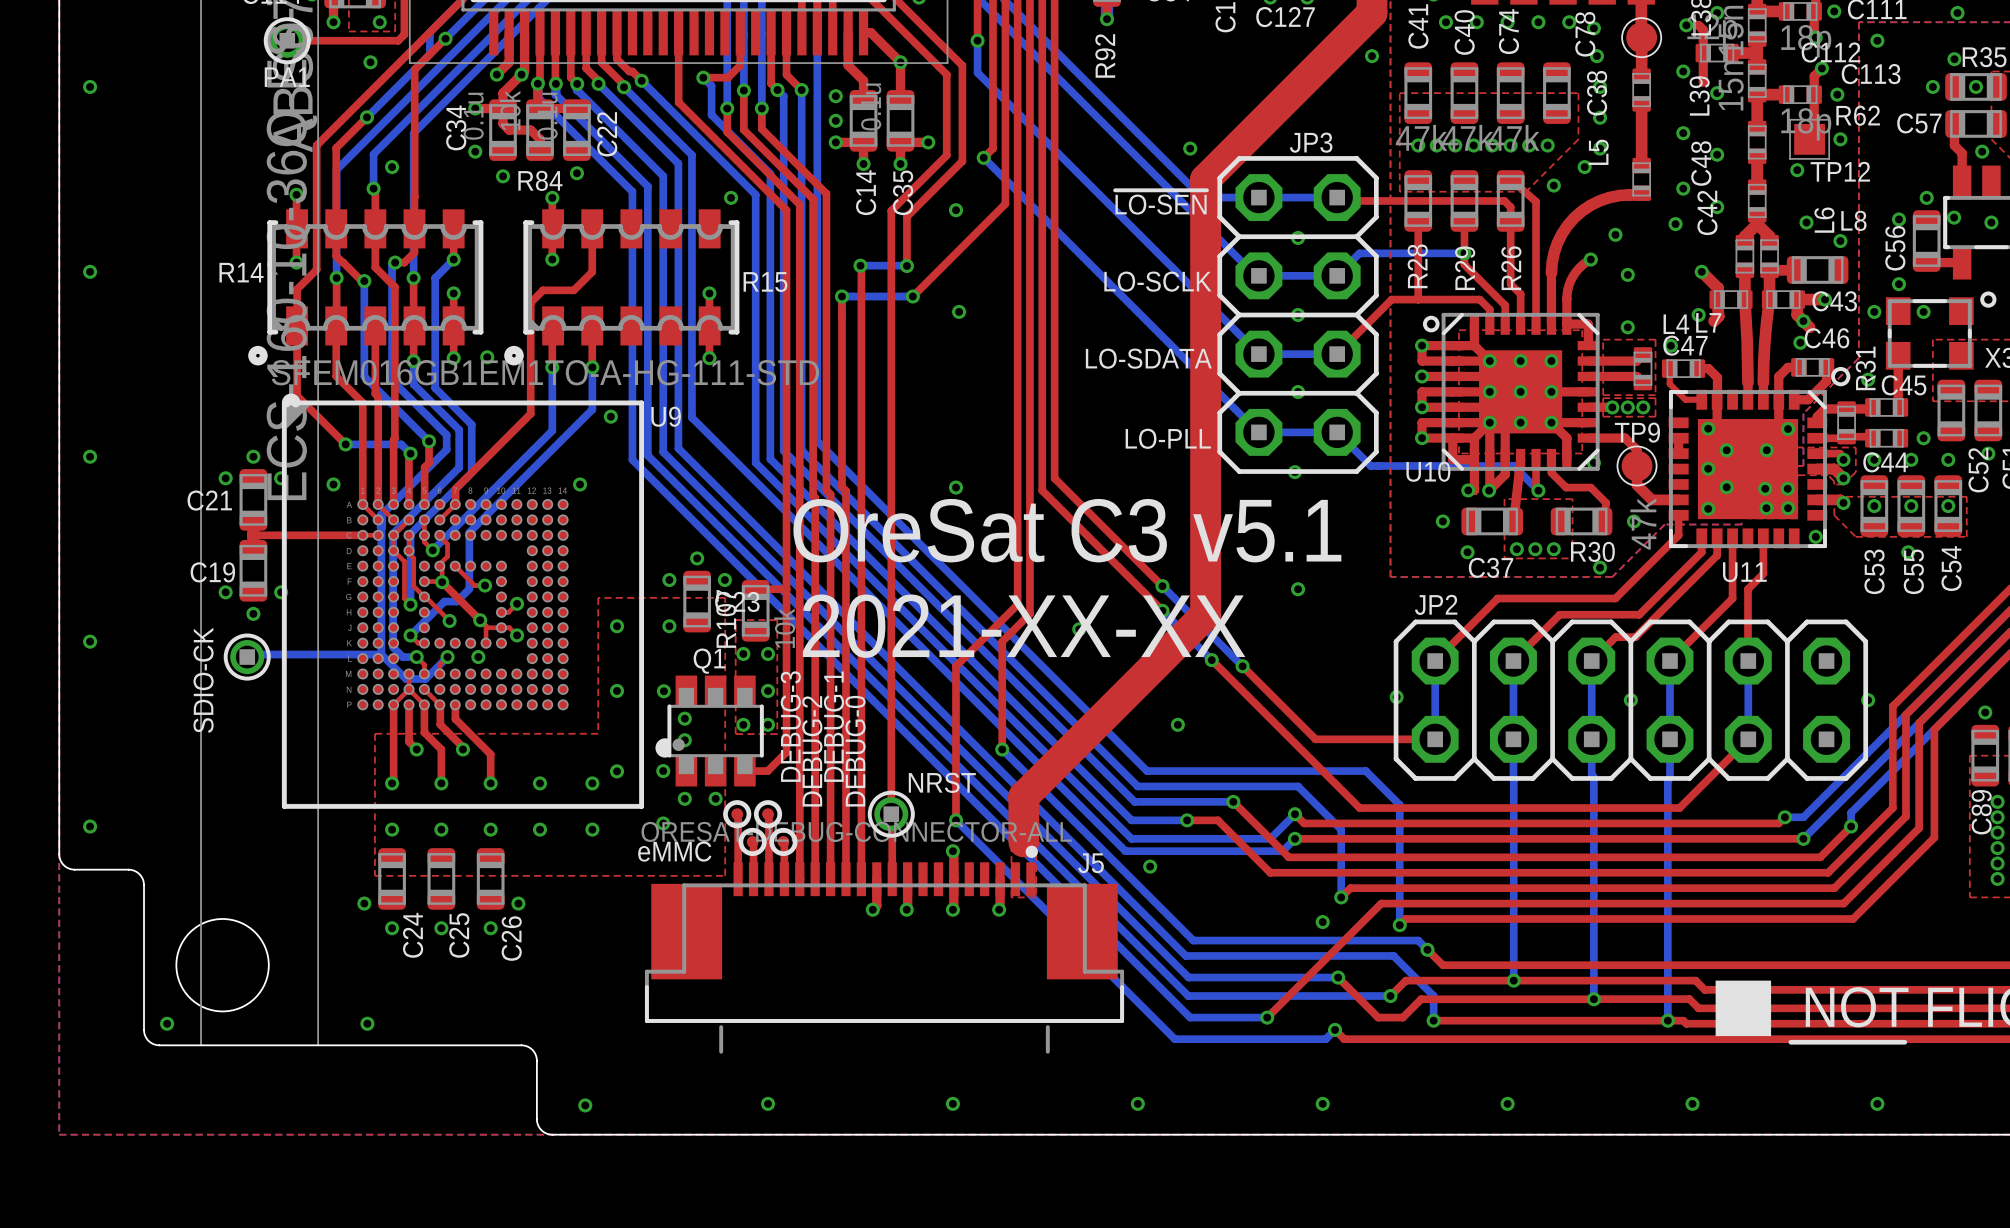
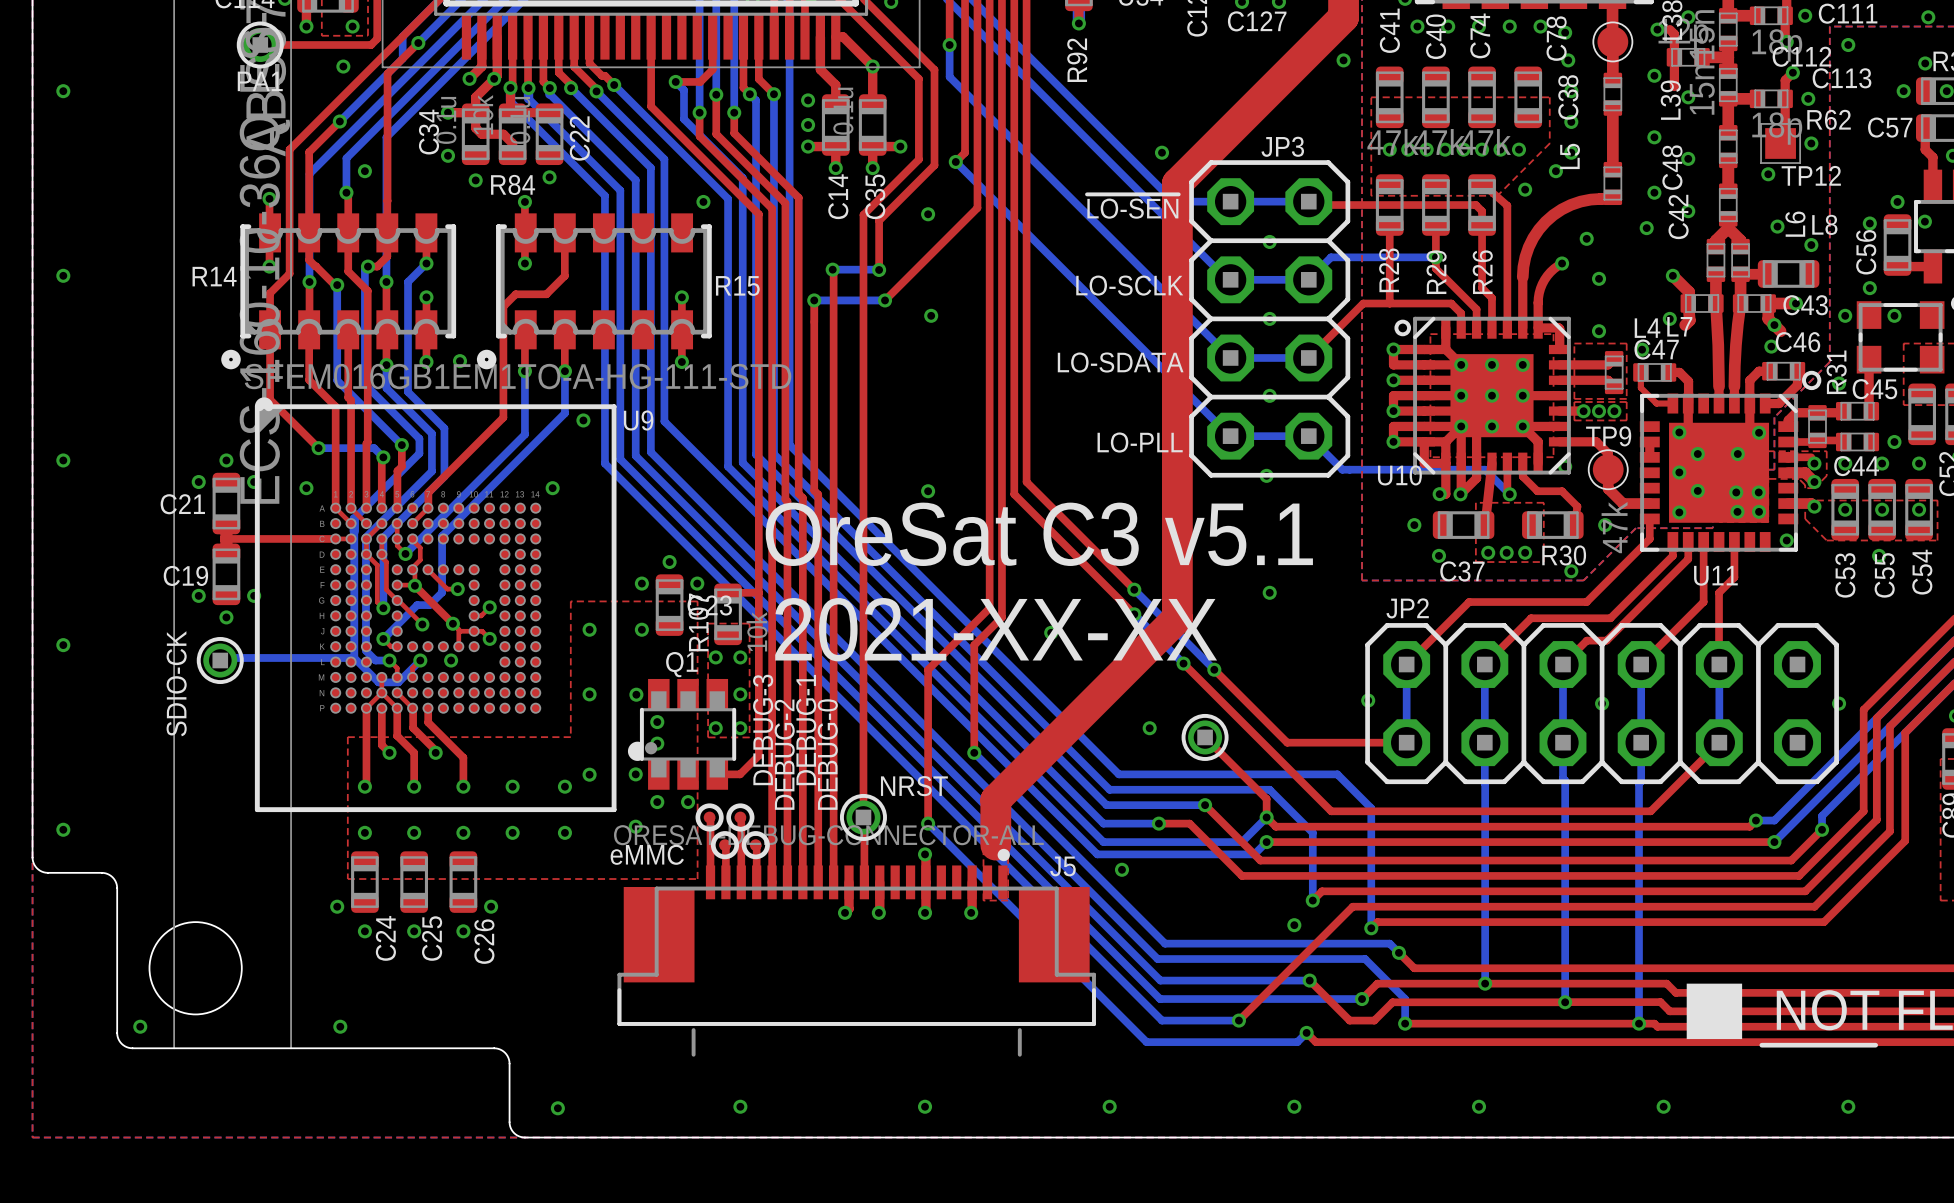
top track: none -> (1205, 737) (1266, 799) (1266, 817)
part: none -> (1205, 737)

